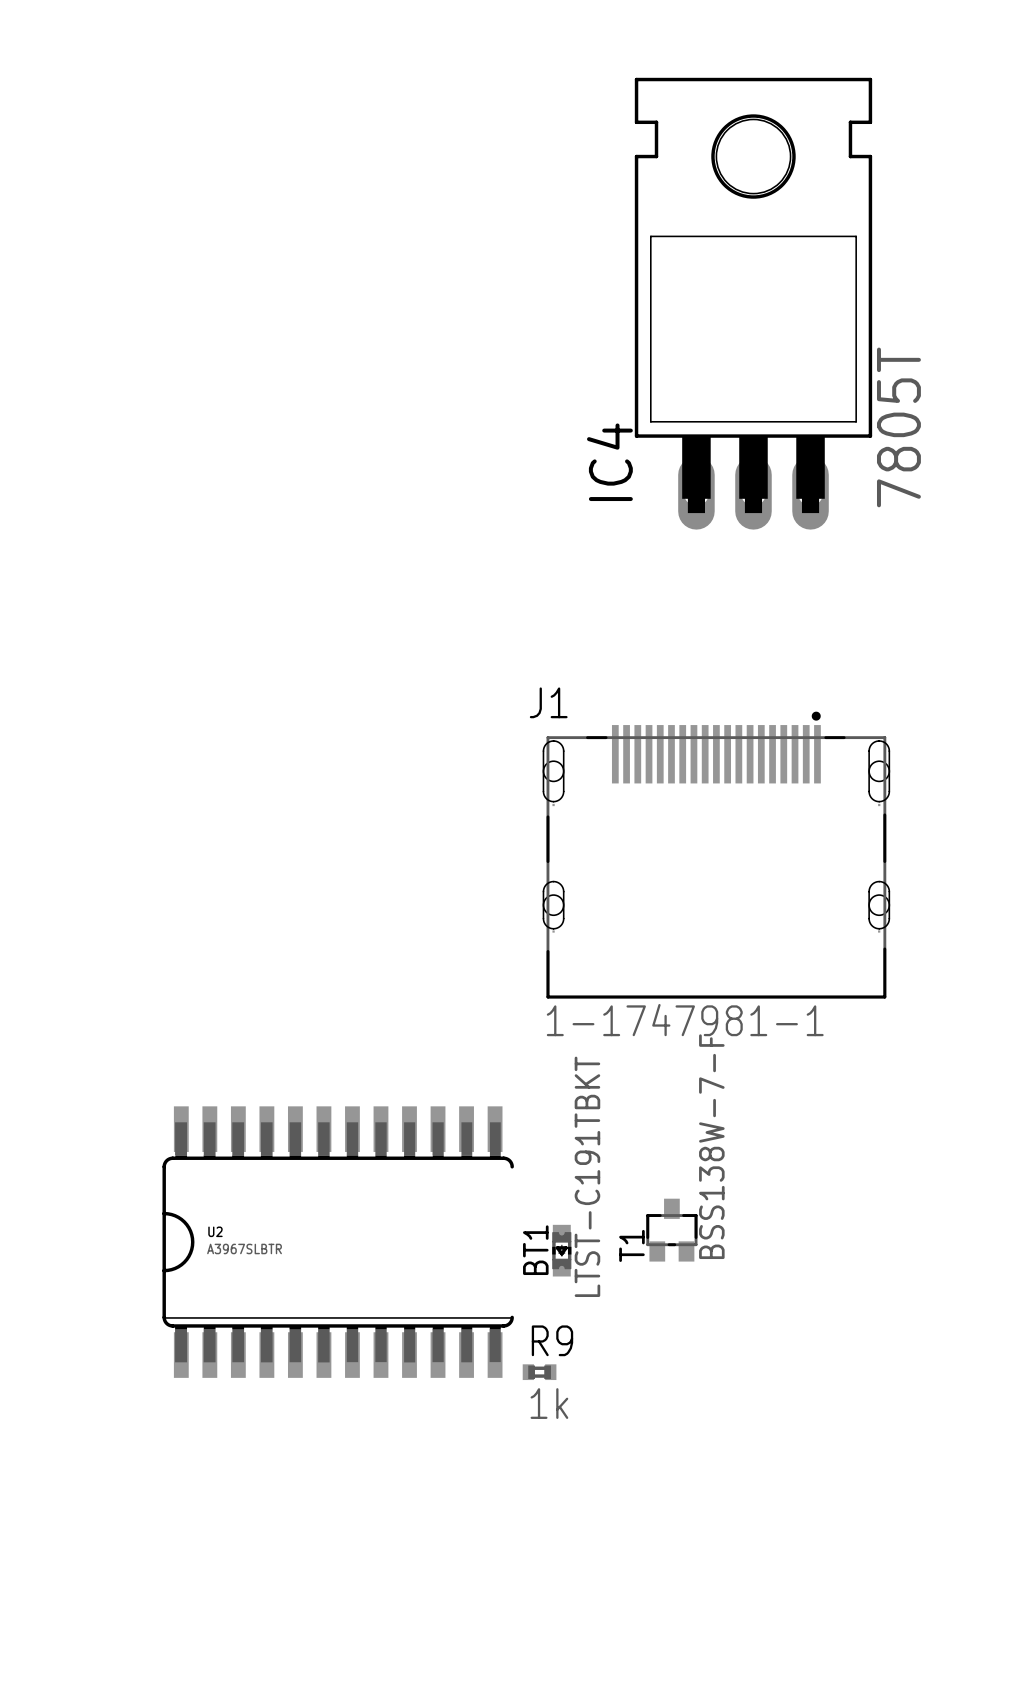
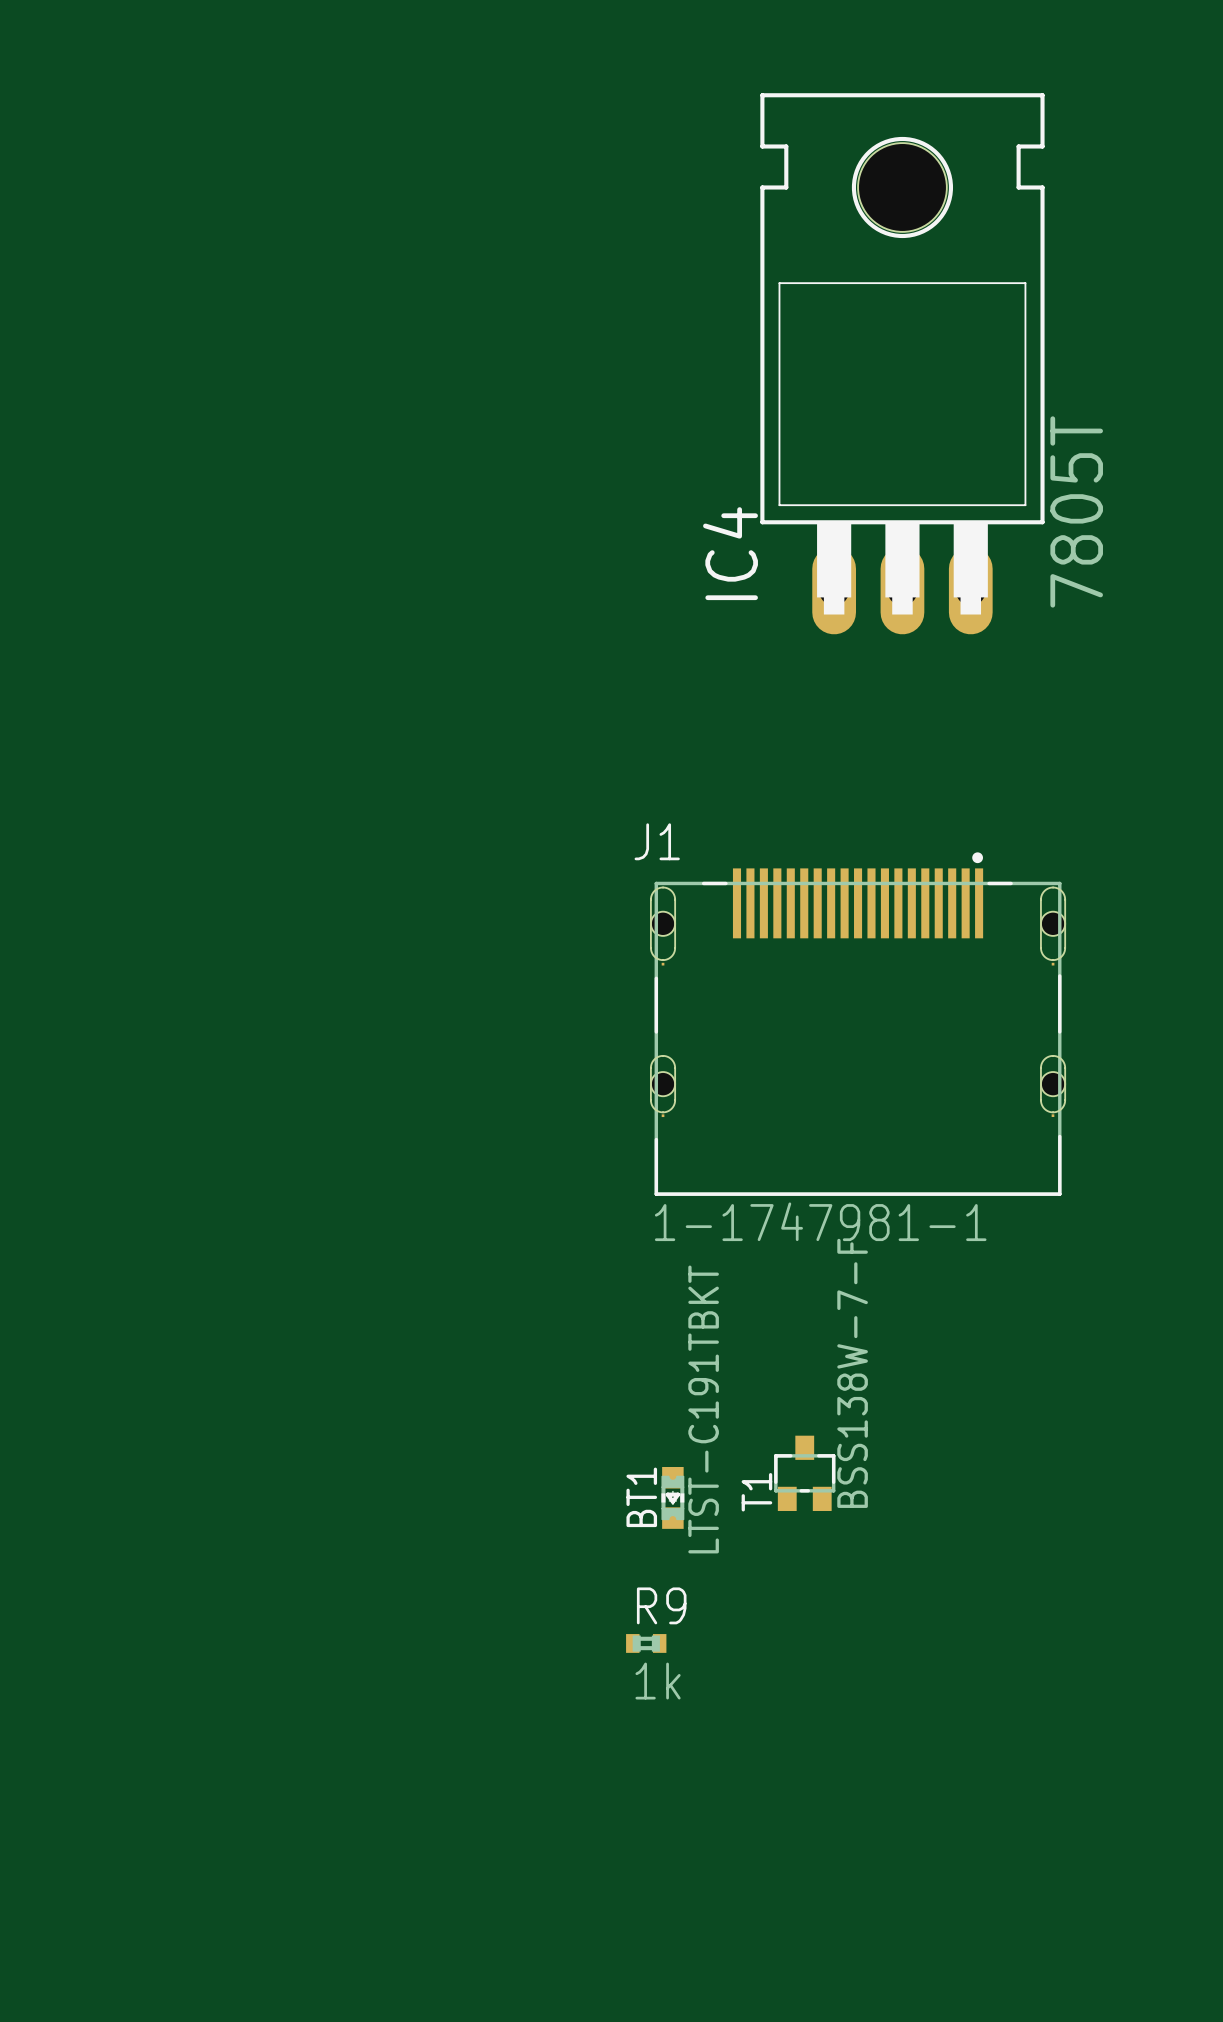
U2: A3967SLBTR (338, 1242) -> none

